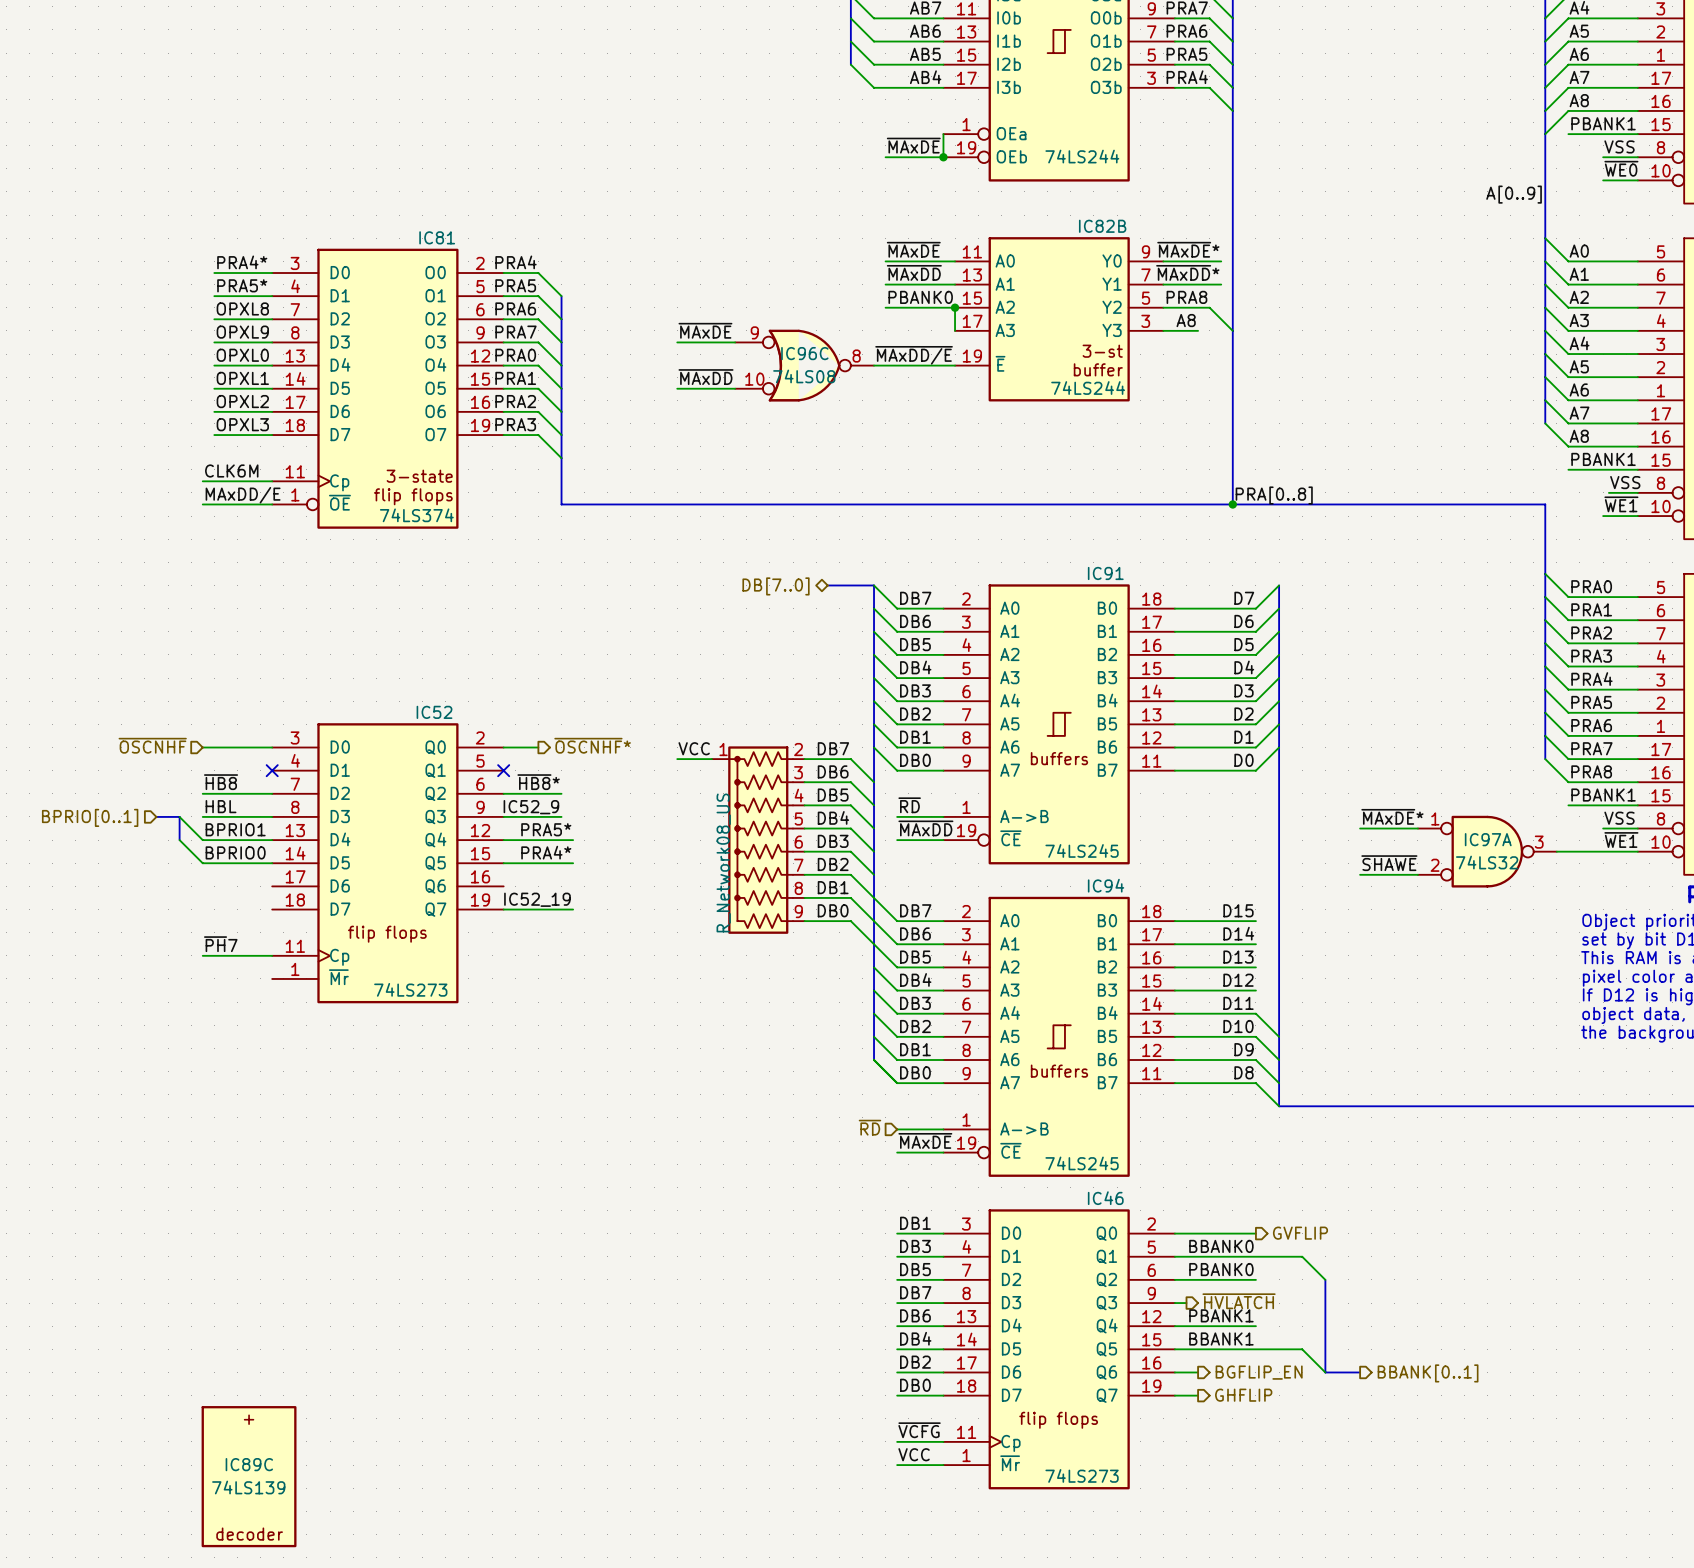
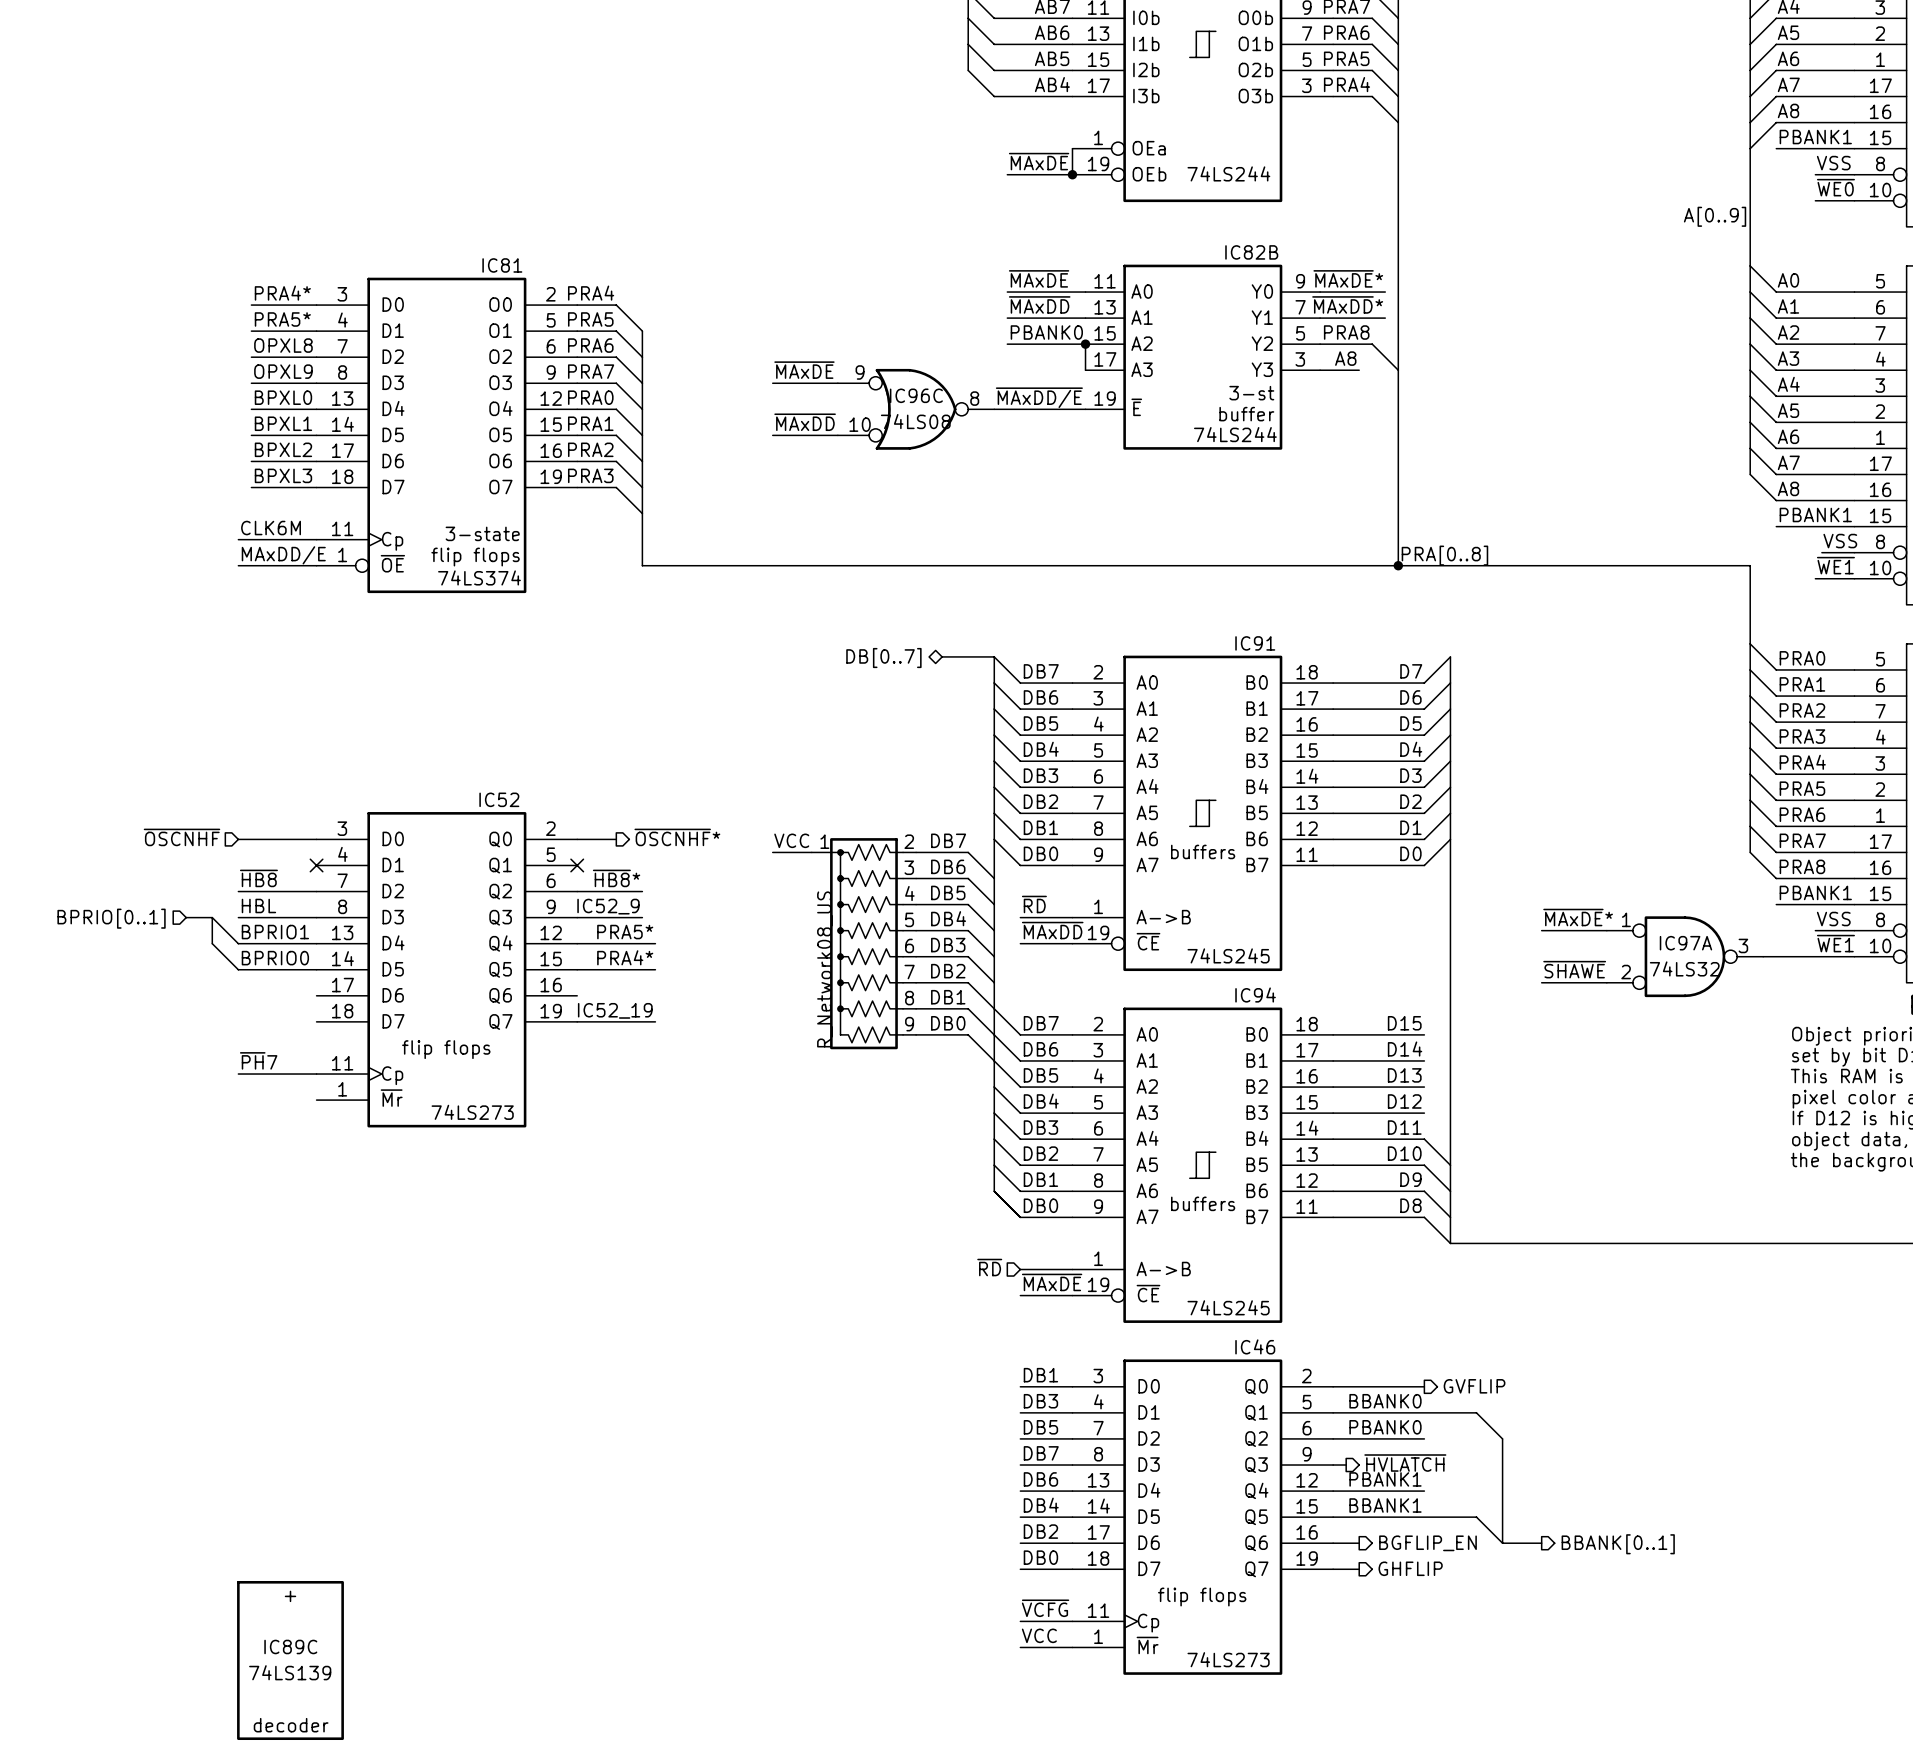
label: OPXL0 (242, 355) -> BPXL0 (283, 397)
label: OPXL1 (242, 378) -> BPXL1 (283, 423)
label: OPXL2 (242, 401) -> BPXL2 (283, 449)
label: OPXL3 (242, 424) -> BPXL3 (283, 475)
hierarchical label: DB[7..0] (776, 586) -> DB[0..7] (883, 658)

